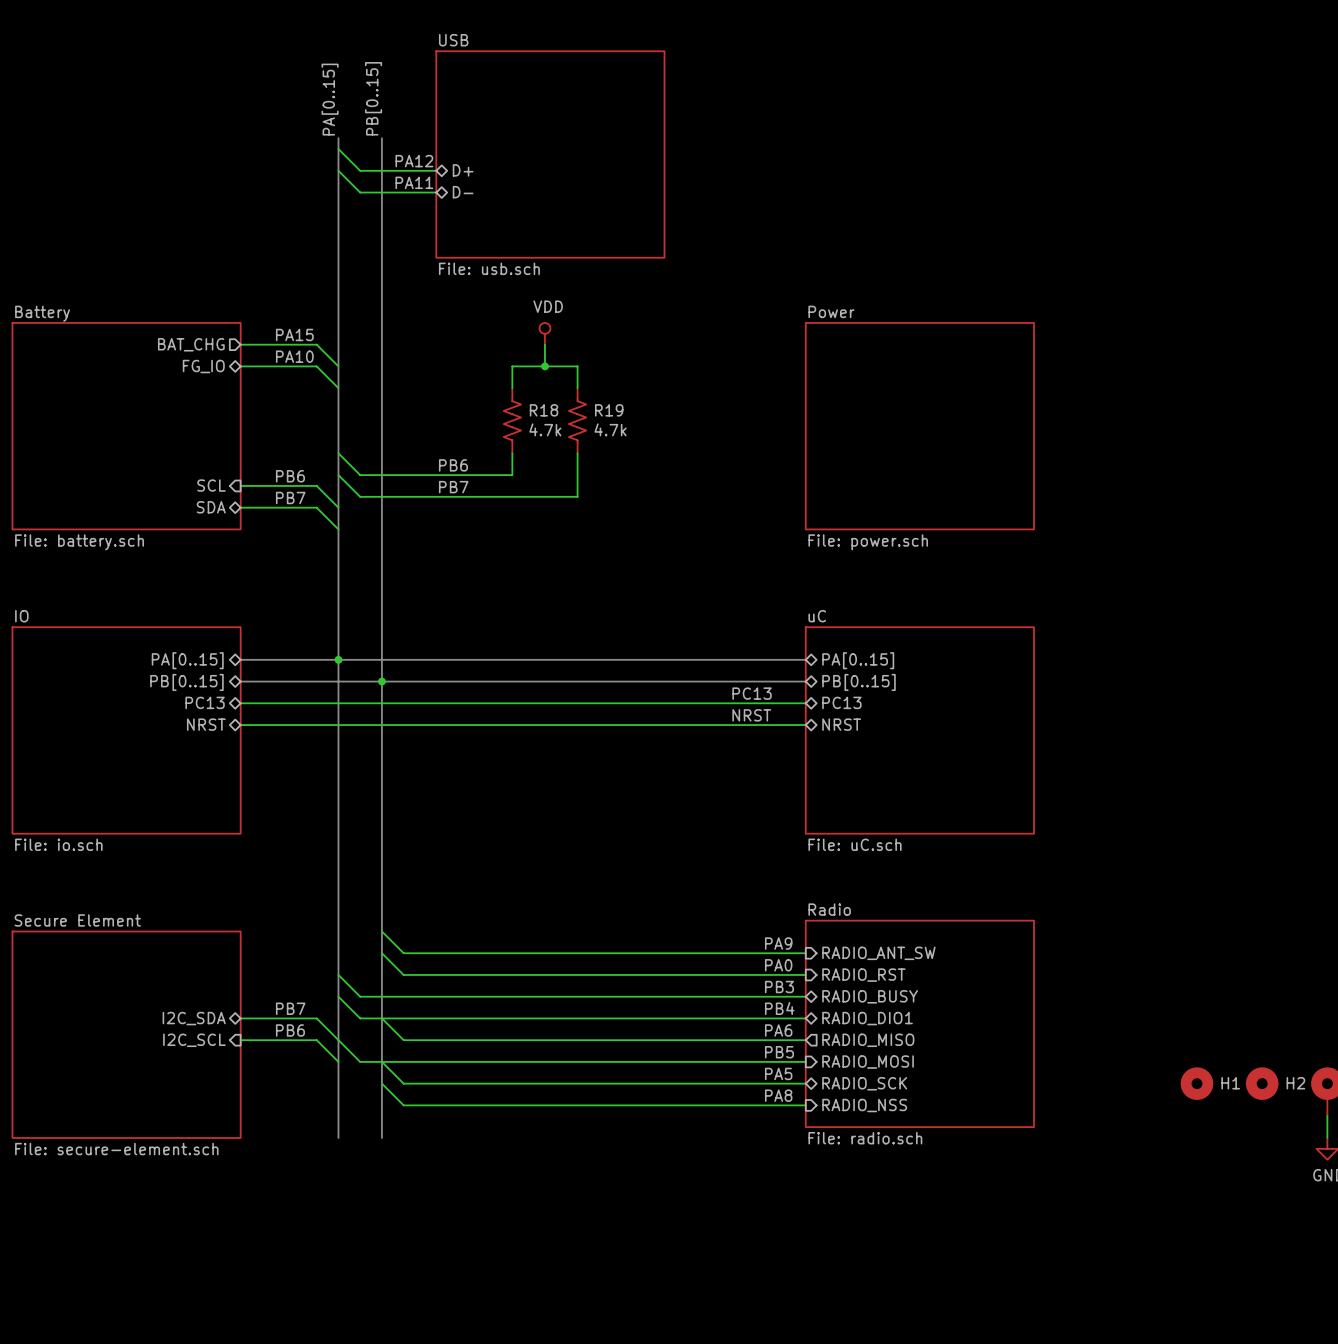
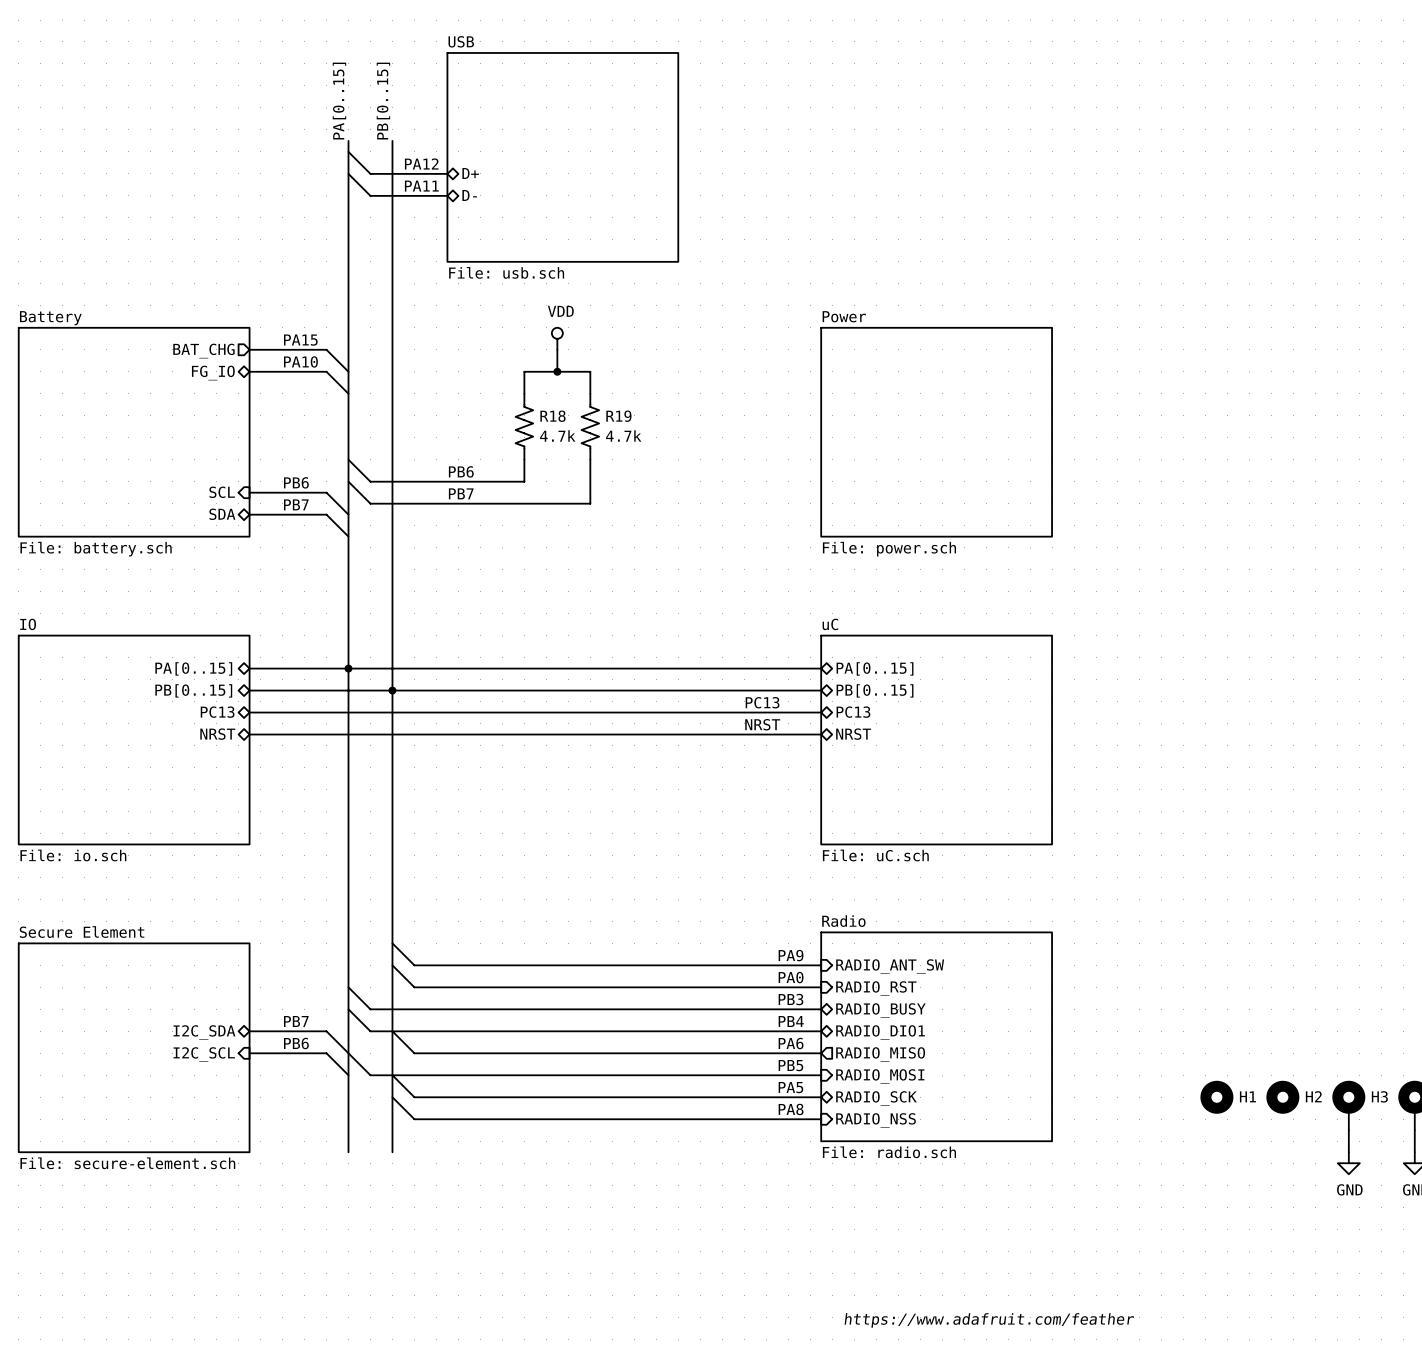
text: none -> https://www.adafruit.com/feather (989, 1320)

